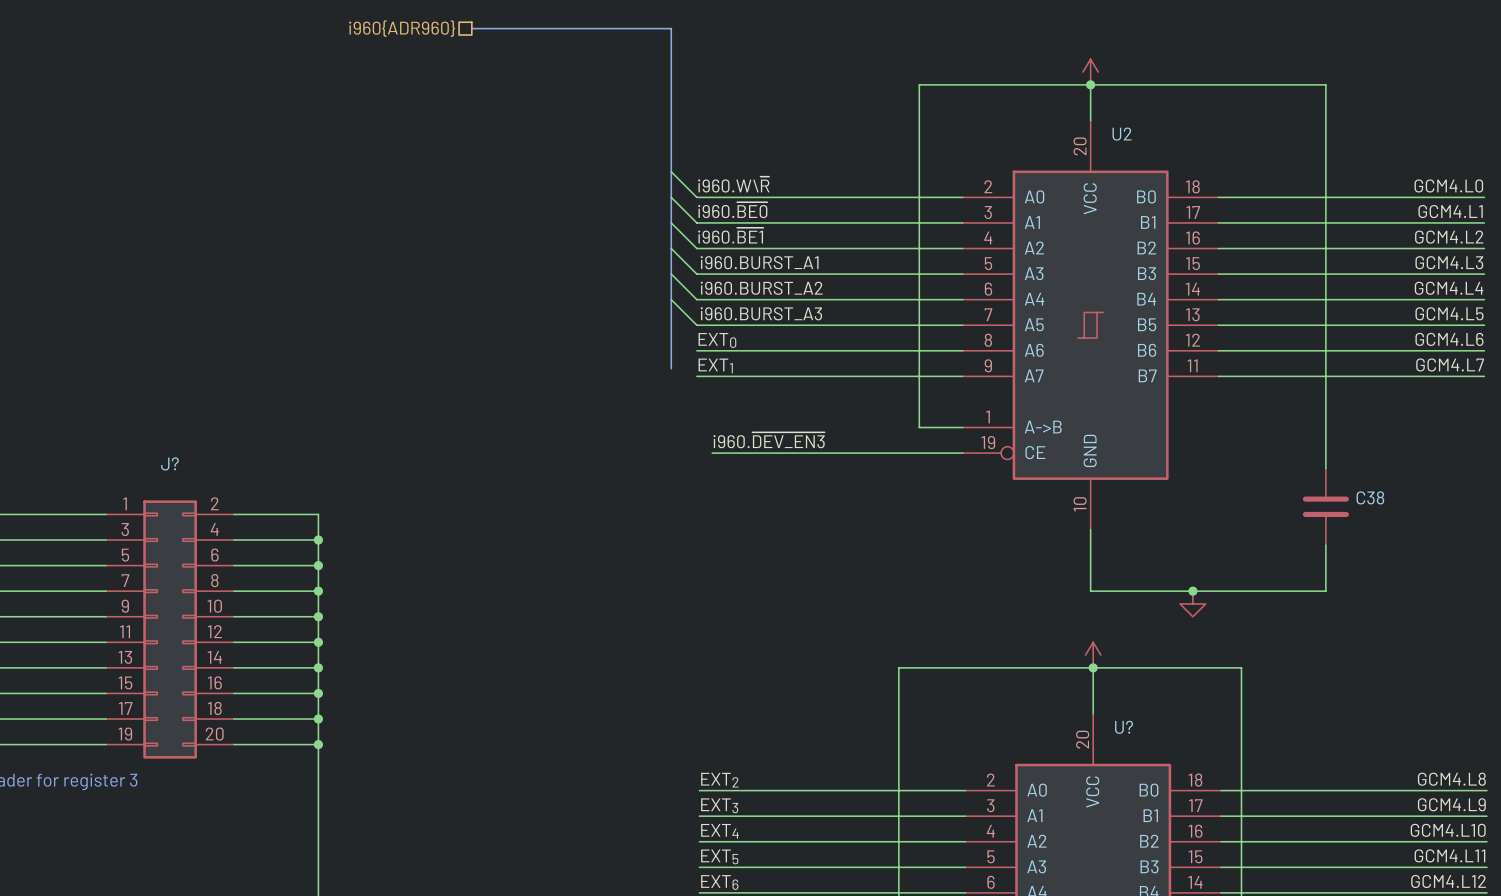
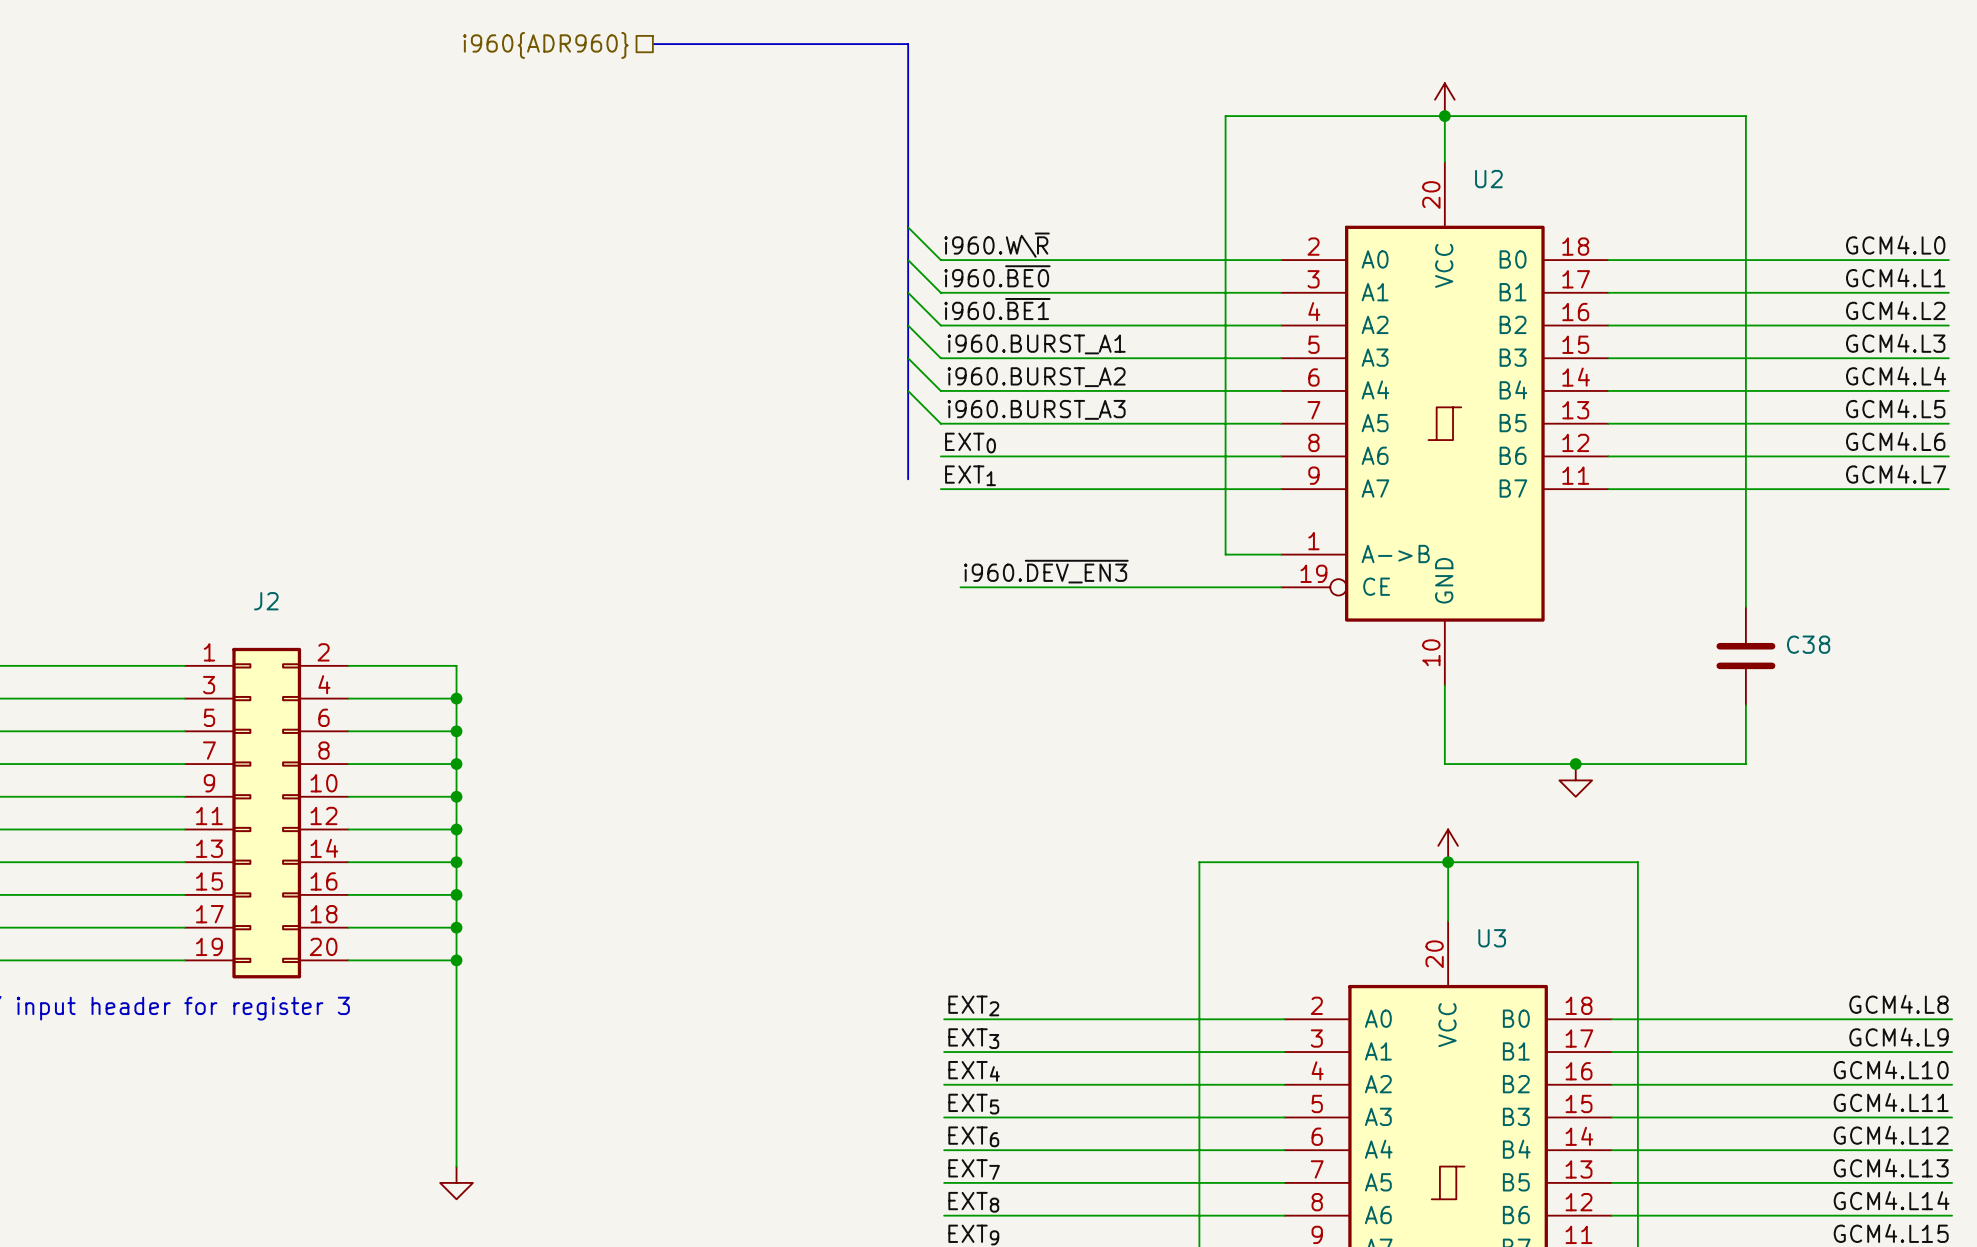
J? name: J? (169, 463) -> J2 (266, 601)
U? name: U? (1124, 727) -> U3 (1492, 938)

